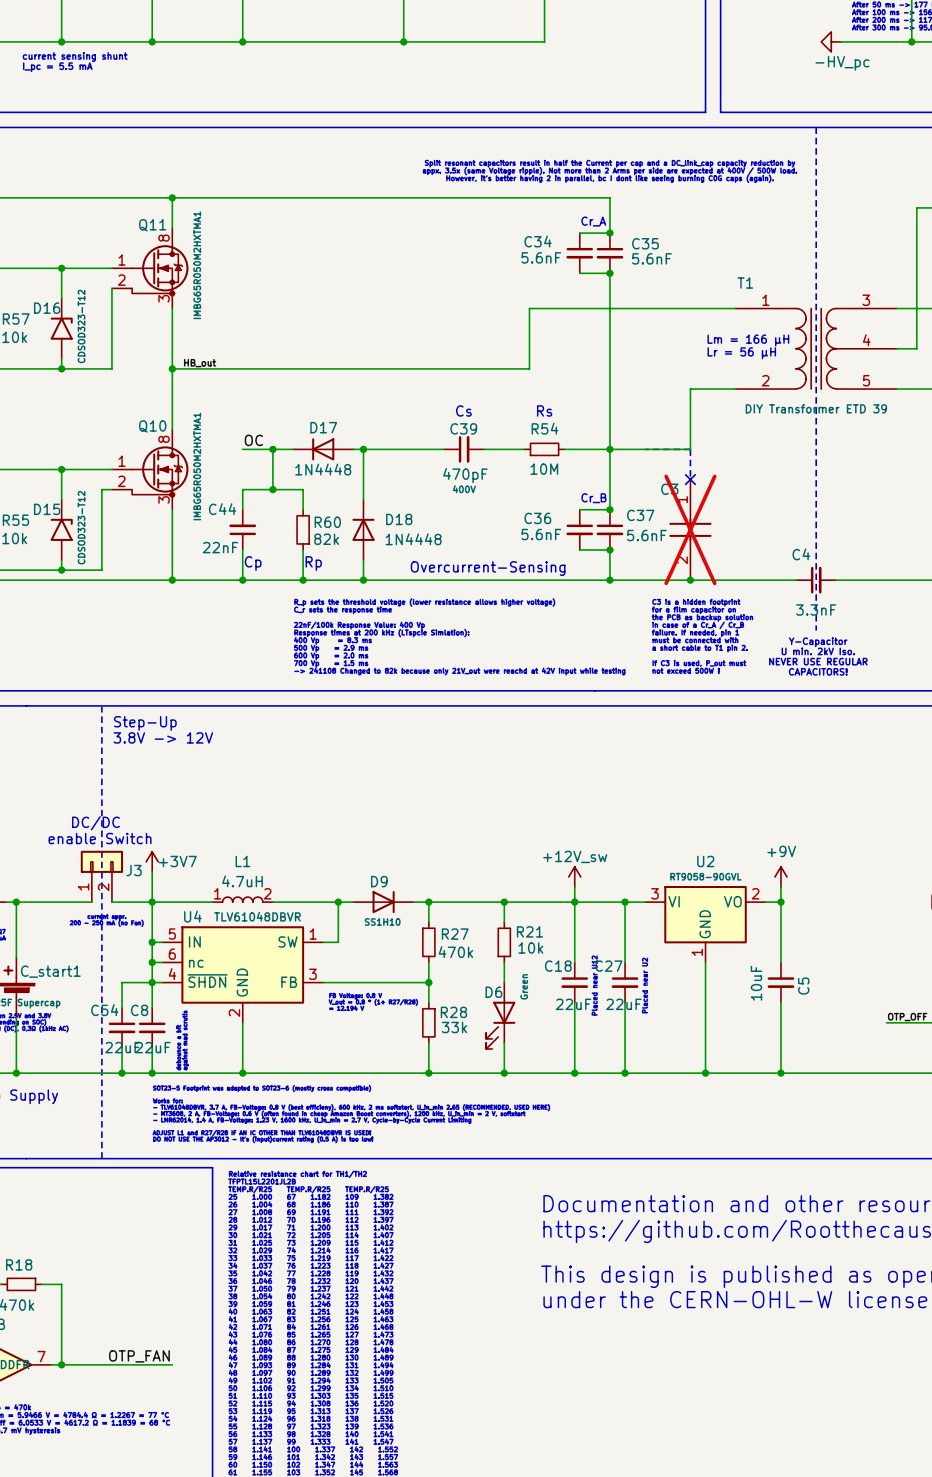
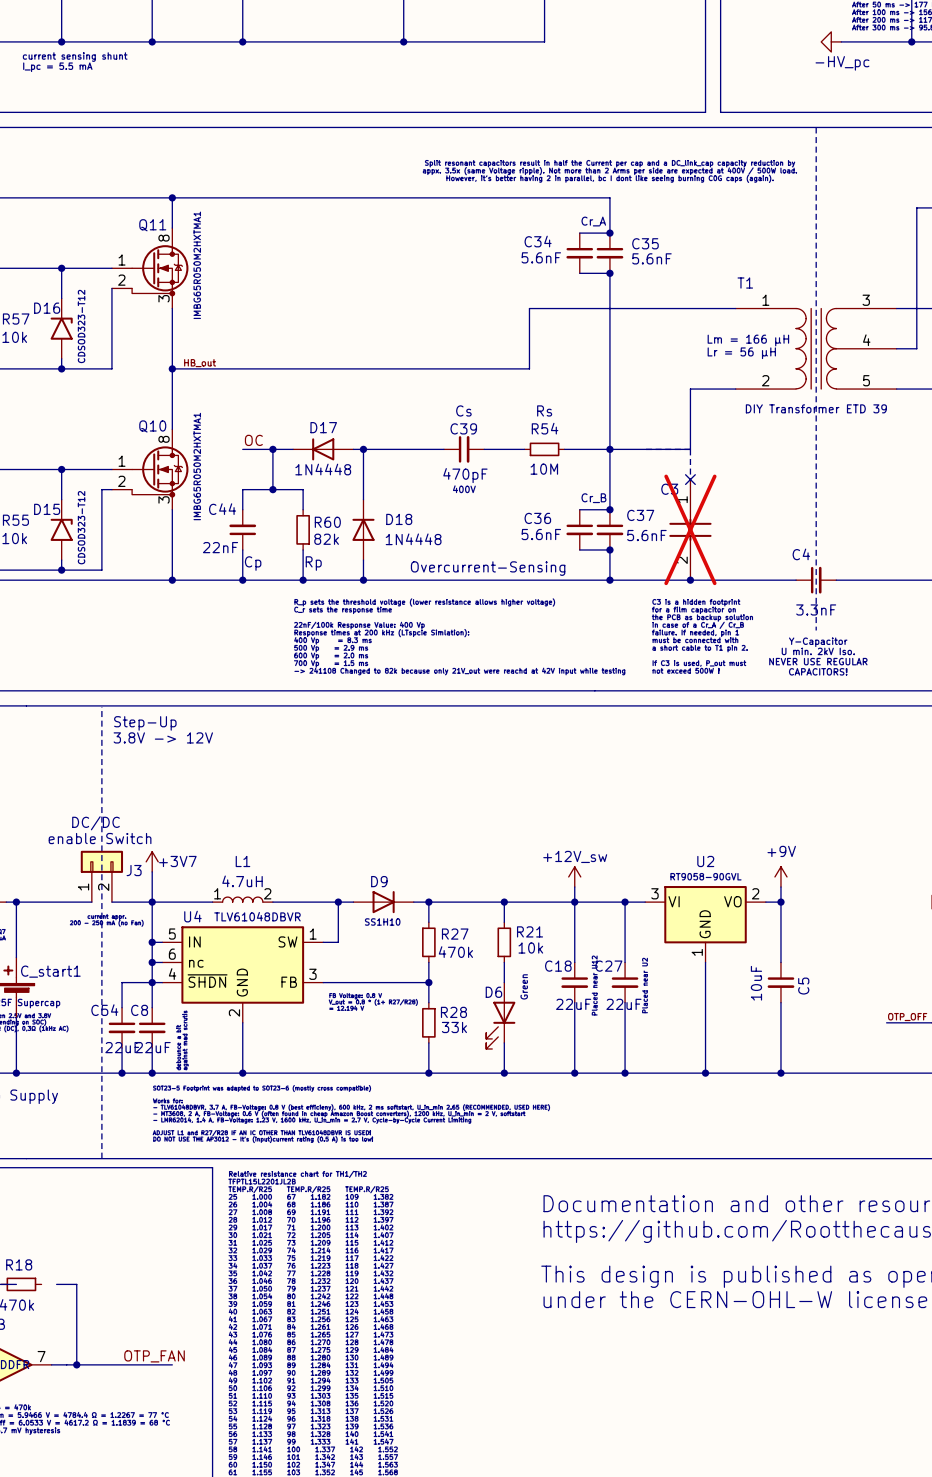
wire: (41, 1284) (56, 1284) -> (1, 1284) (16, 1284)
wire: (61, 1284) (61, 1364) -> (61, 1284) (76, 1284) (76, 1364)
label position: OTP_FAN (139, 1356) -> OTP_FAN (154, 1356)
junction position: (61, 1364) -> (76, 1364)

